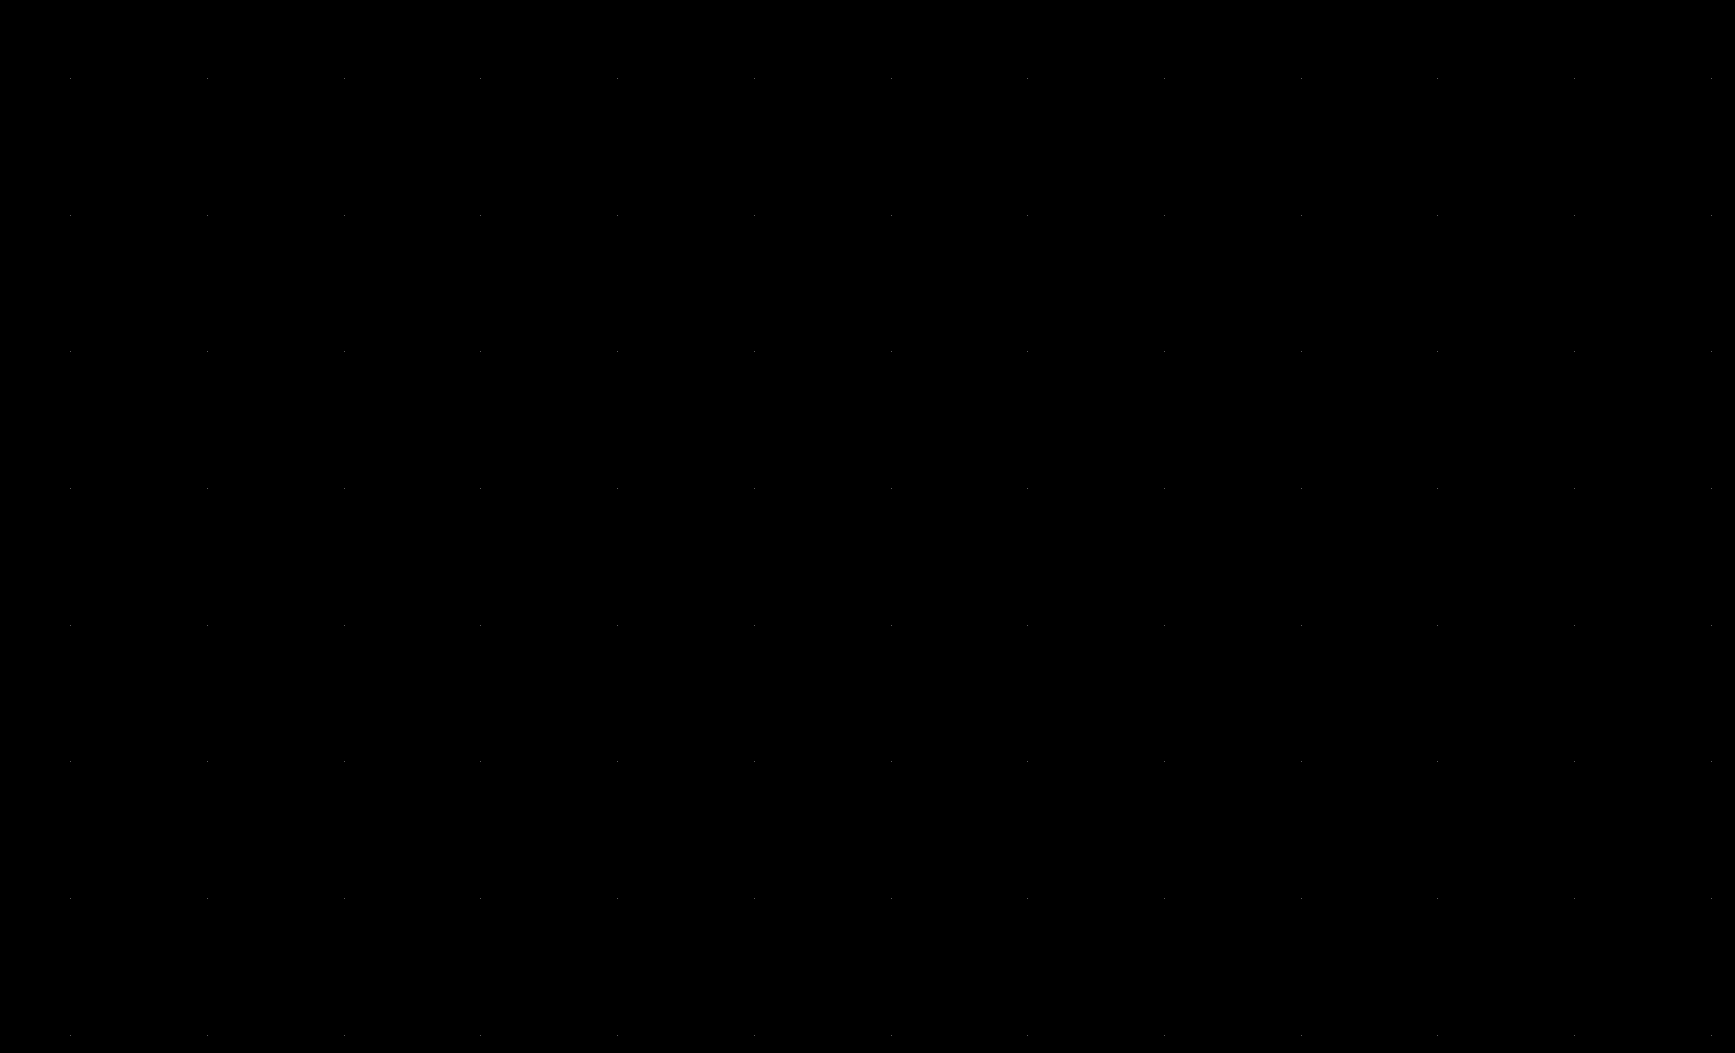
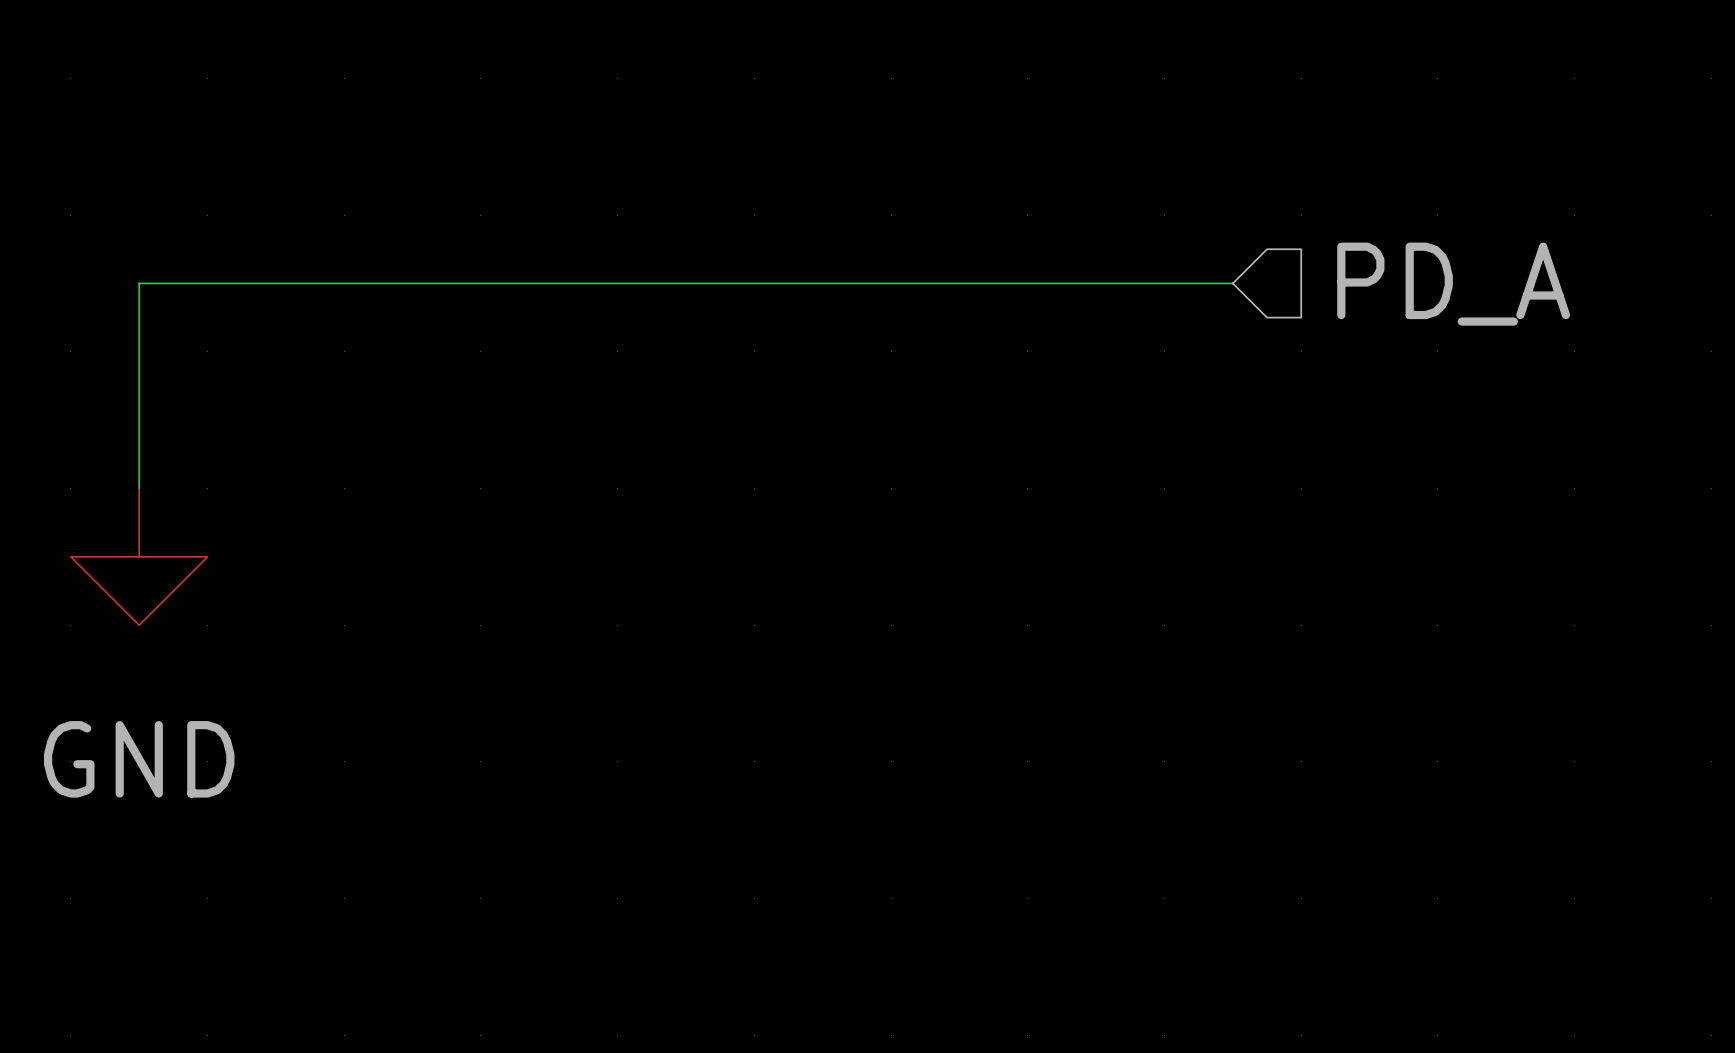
wire: none -> (1232, 283) (139, 283) (139, 488)
hierarchical label: none -> PD_A (1453, 284)
power symbol: none -> GND (139, 556)

